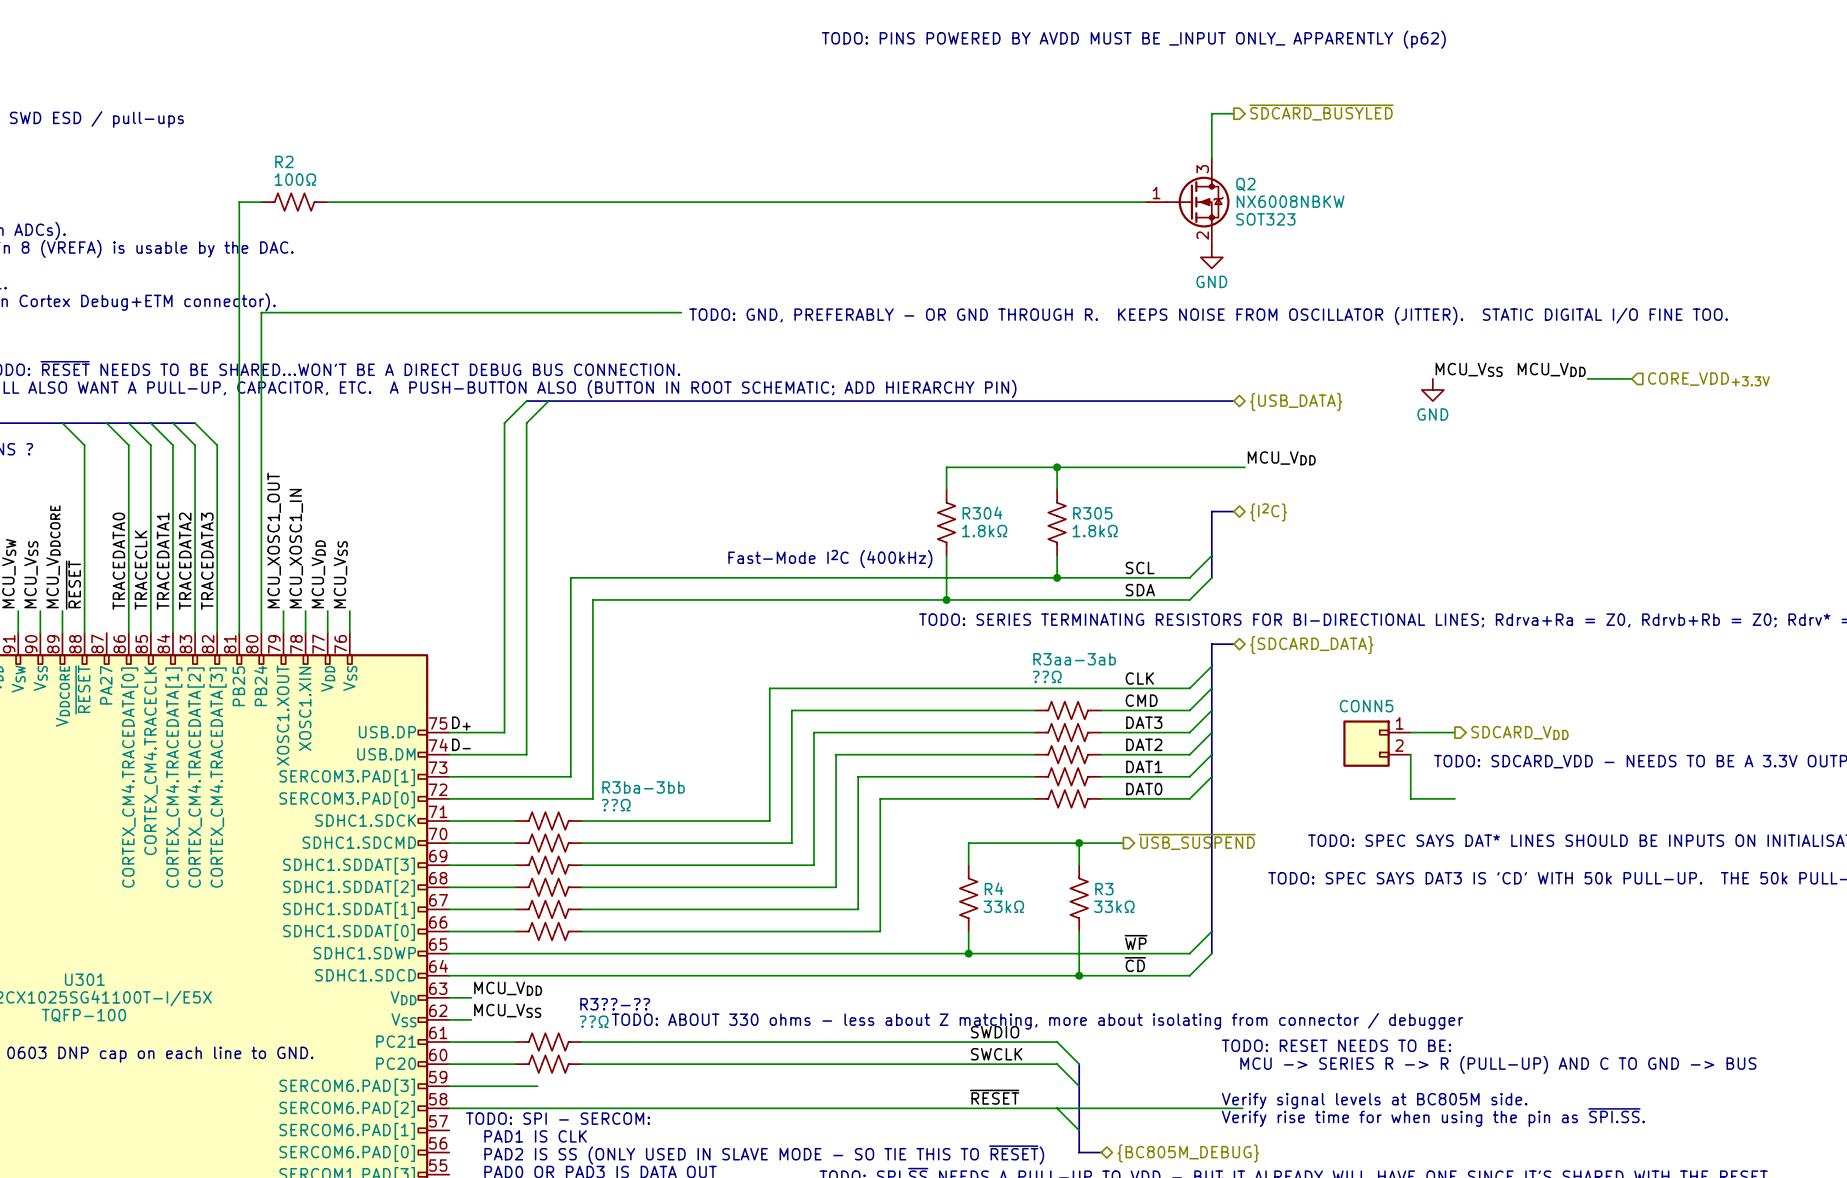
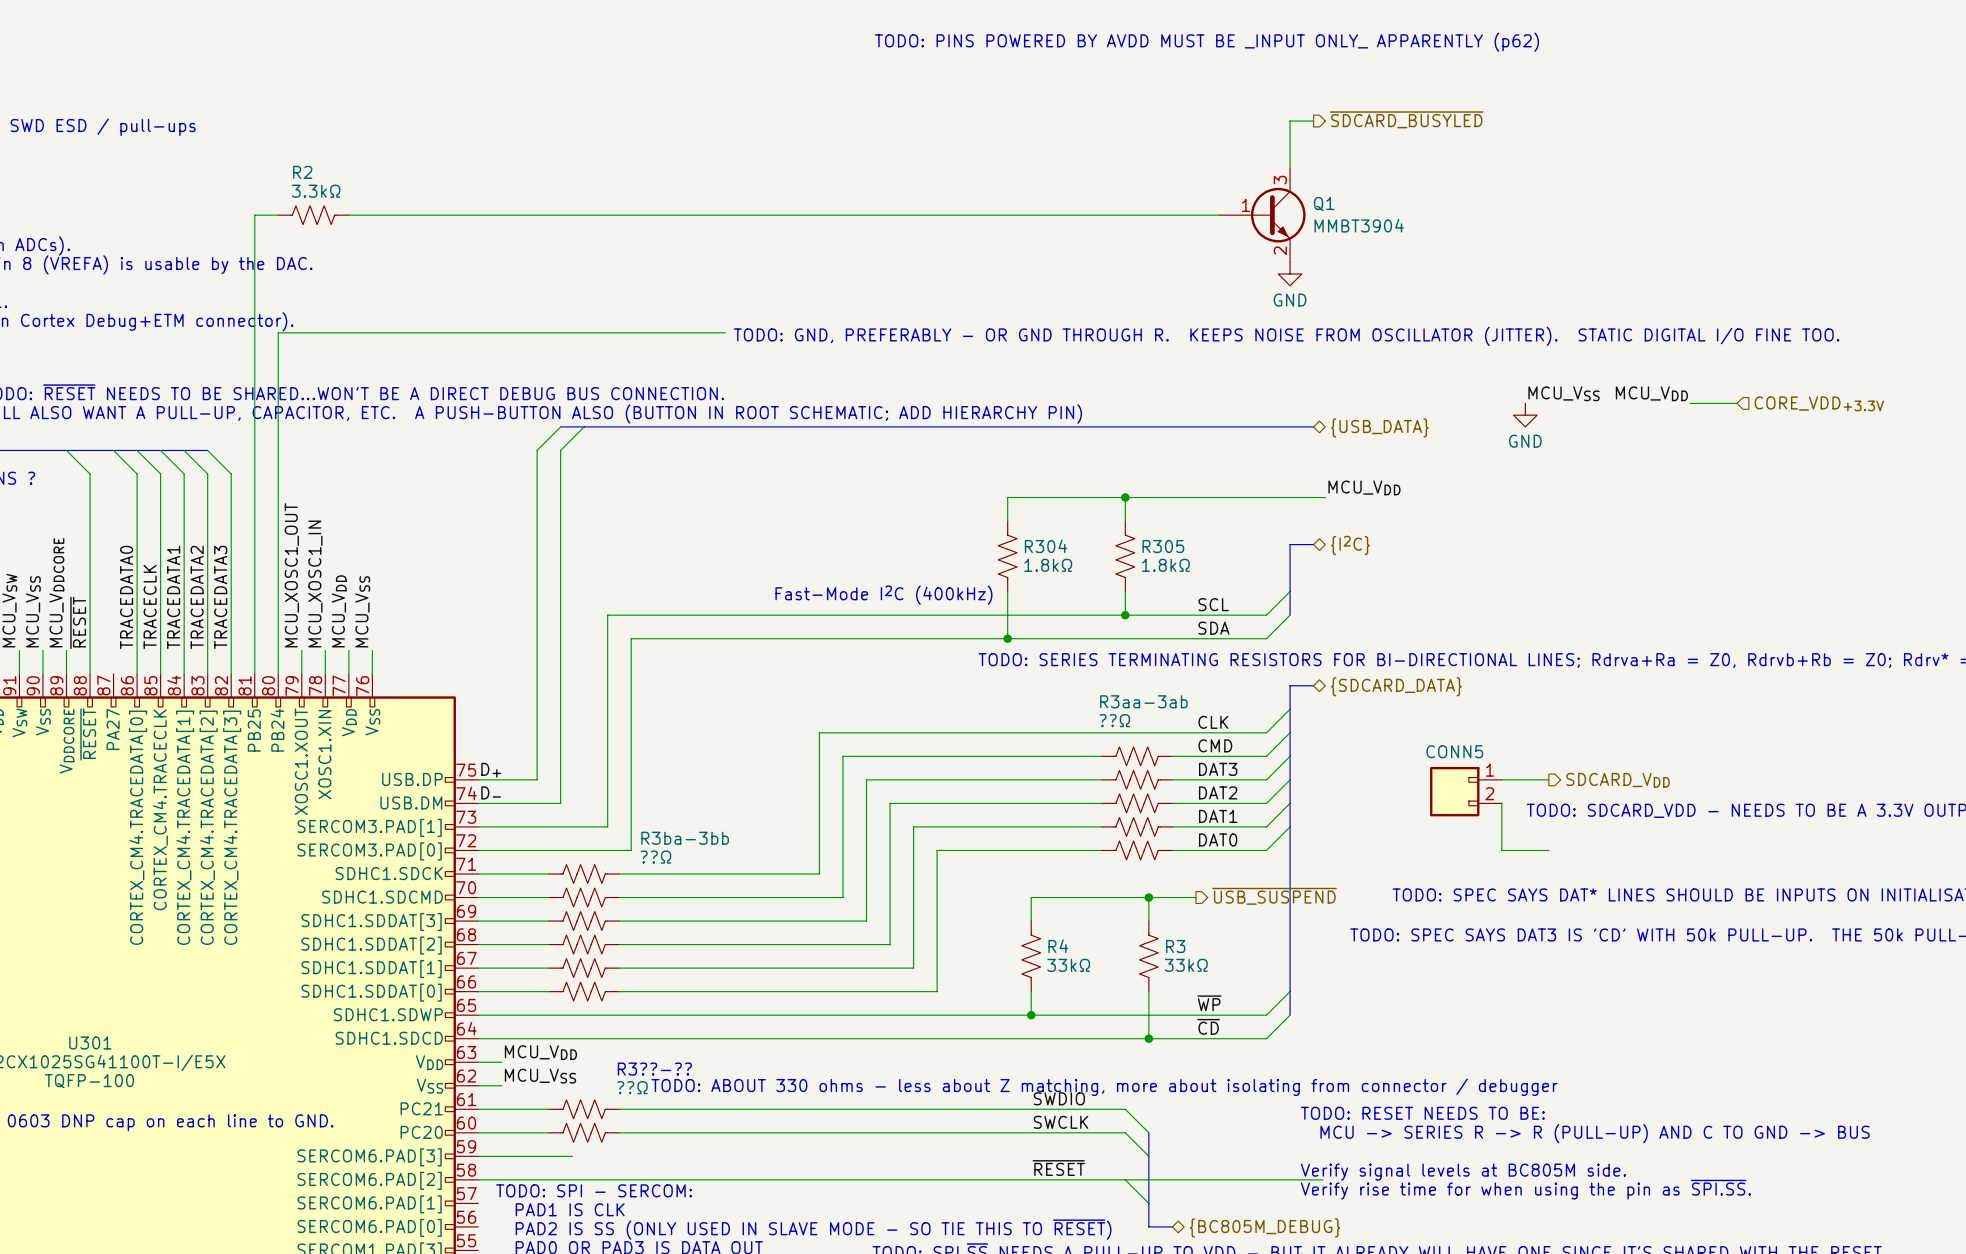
R2 value: 100Ω (295, 179) -> 3.3kΩ (316, 191)
Q1: none -> MMBT3904 (1262, 215)
Q2: NX6008NBKW (1187, 202) -> none

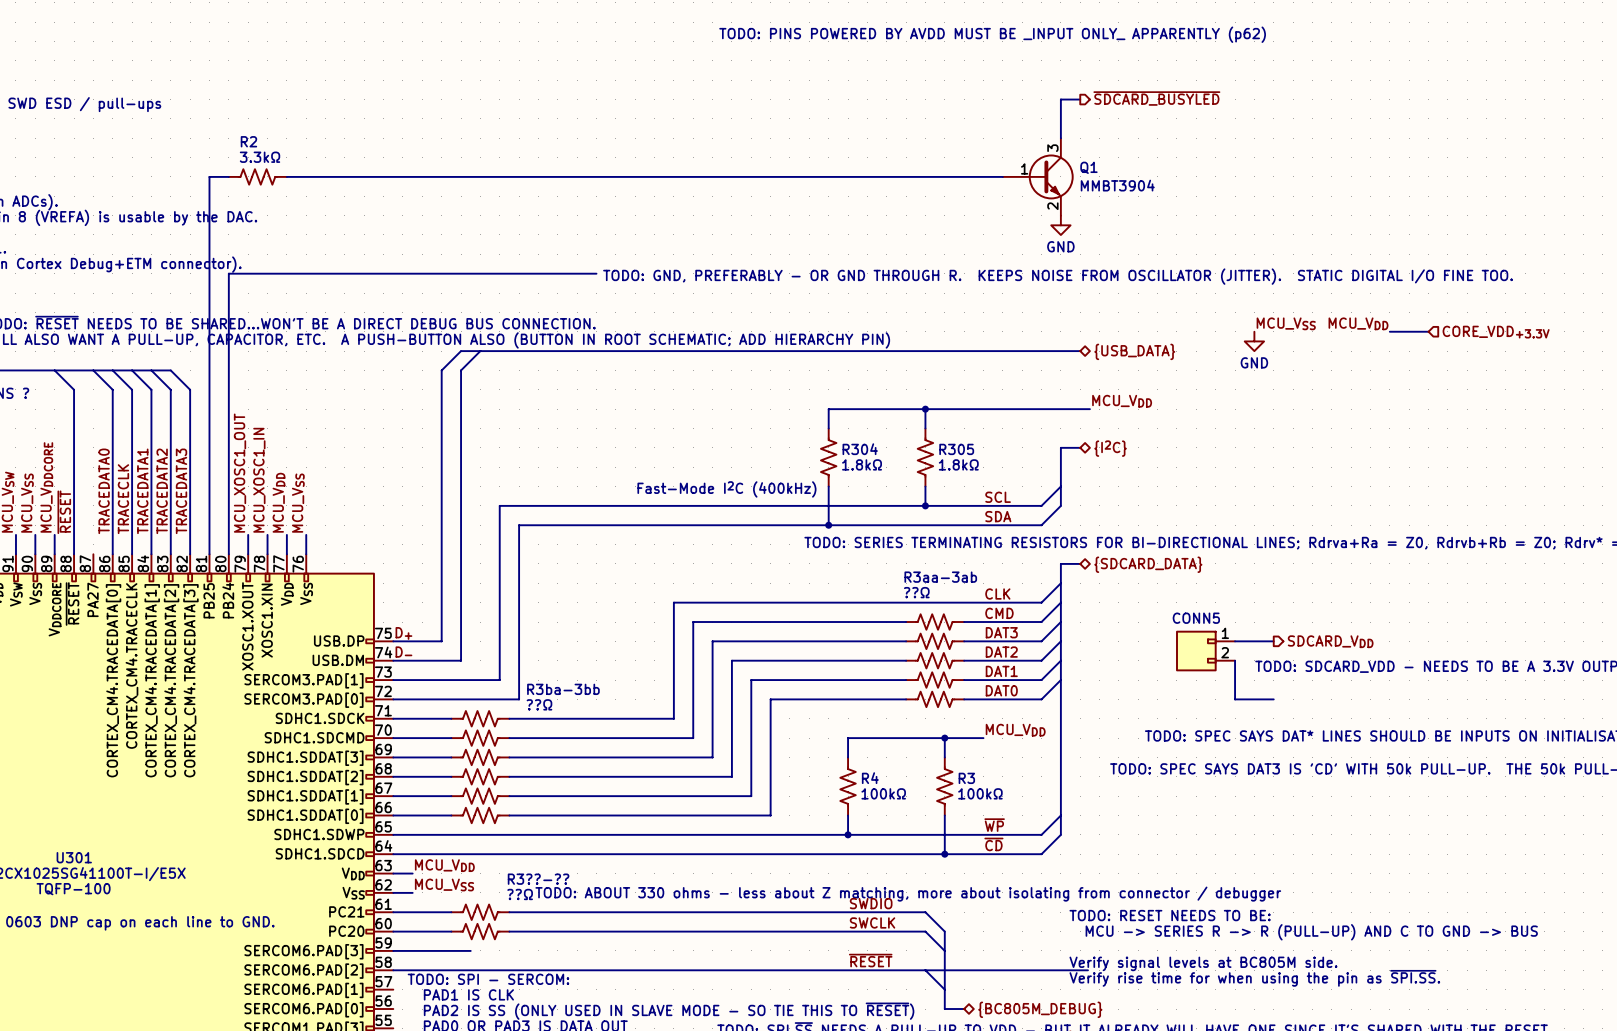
label: none -> MCU_VDD (1015, 730)
hierarchical label: ~{USB_SUSPEND} (1274, 896) -> none
R4 value: 33kΩ (1068, 965) -> 100kΩ (883, 793)
R3 value: 33kΩ (1186, 965) -> 100kΩ (980, 793)

